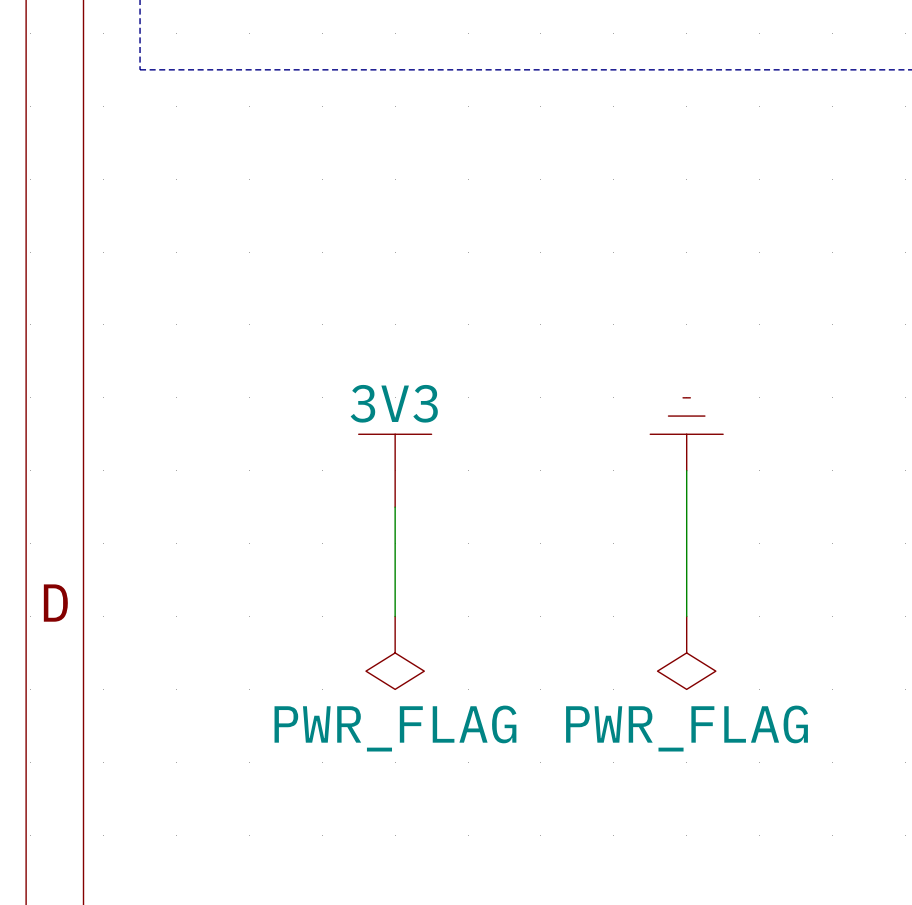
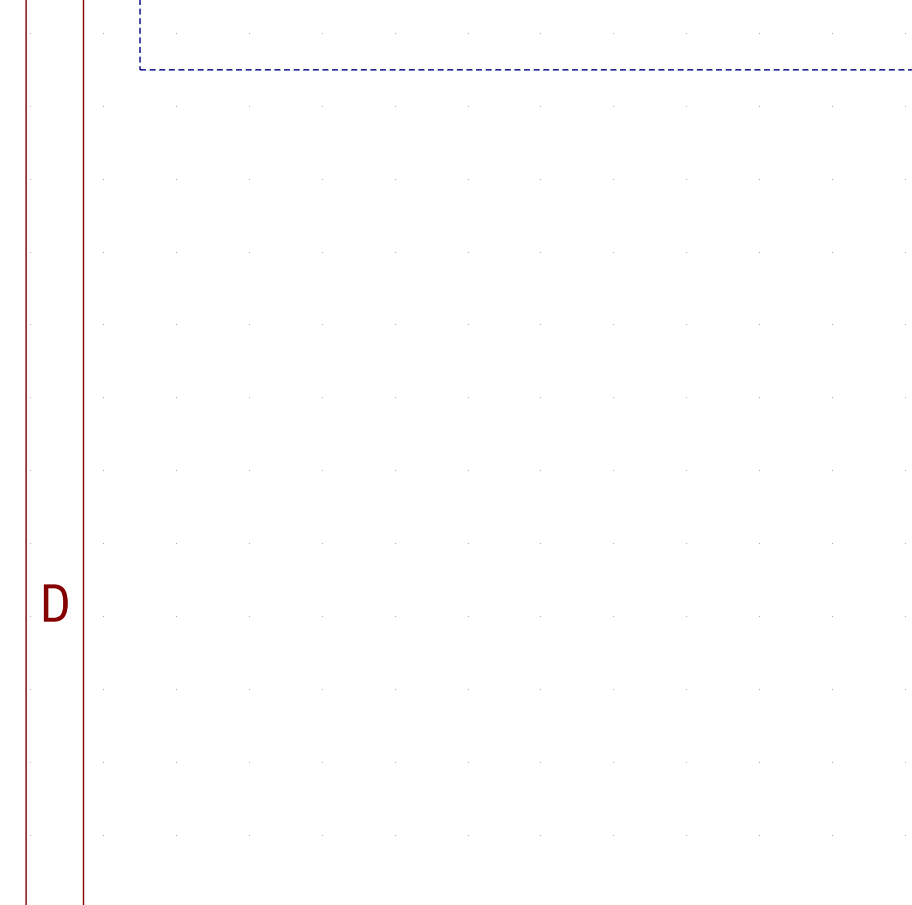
power symbol: (686, 434) -> none
power symbol: 3V3 (395, 470) -> none
wire: (686, 470) (686, 616) -> none
wire: (395, 507) (395, 616) -> none
power symbol: PWR_FLAG (395, 652) -> none
power symbol: PWR_FLAG (686, 652) -> none

